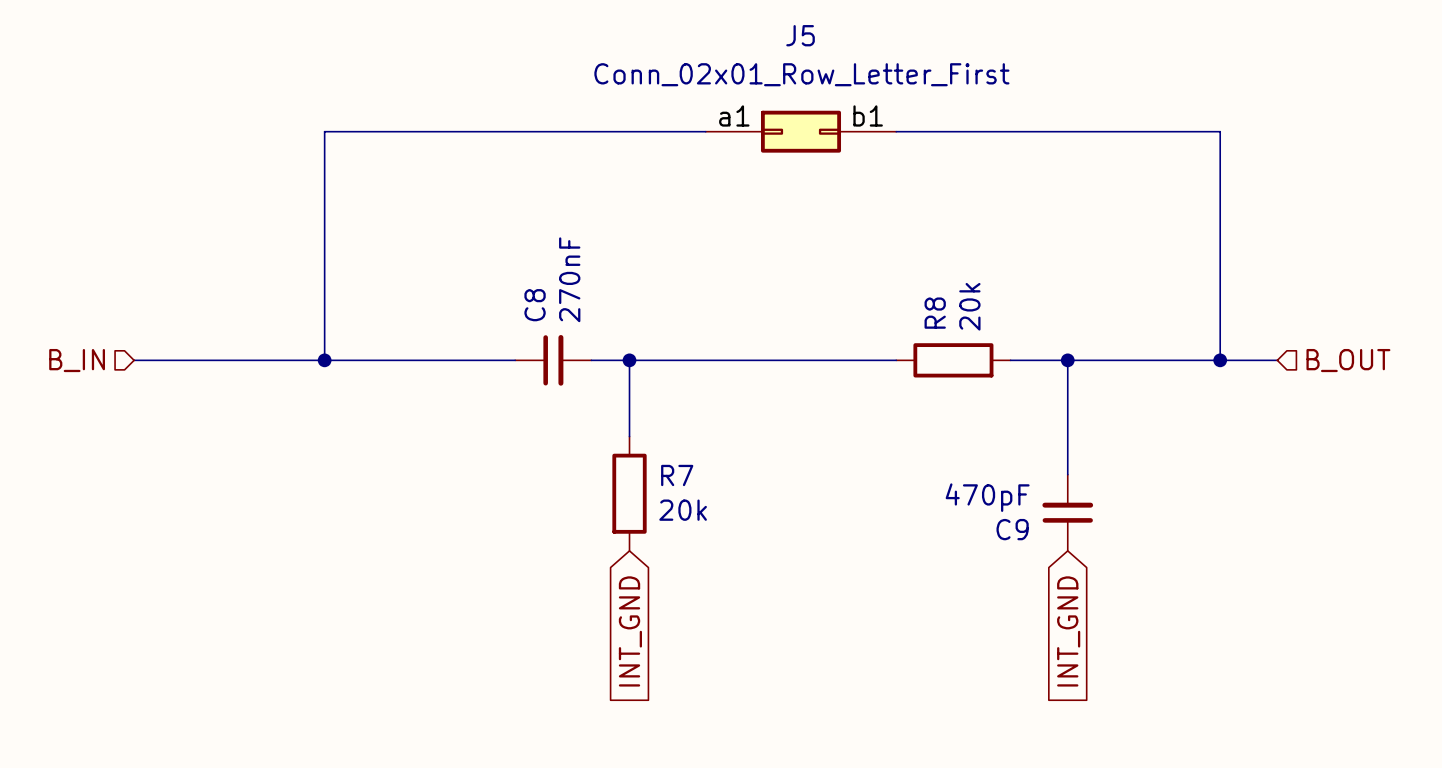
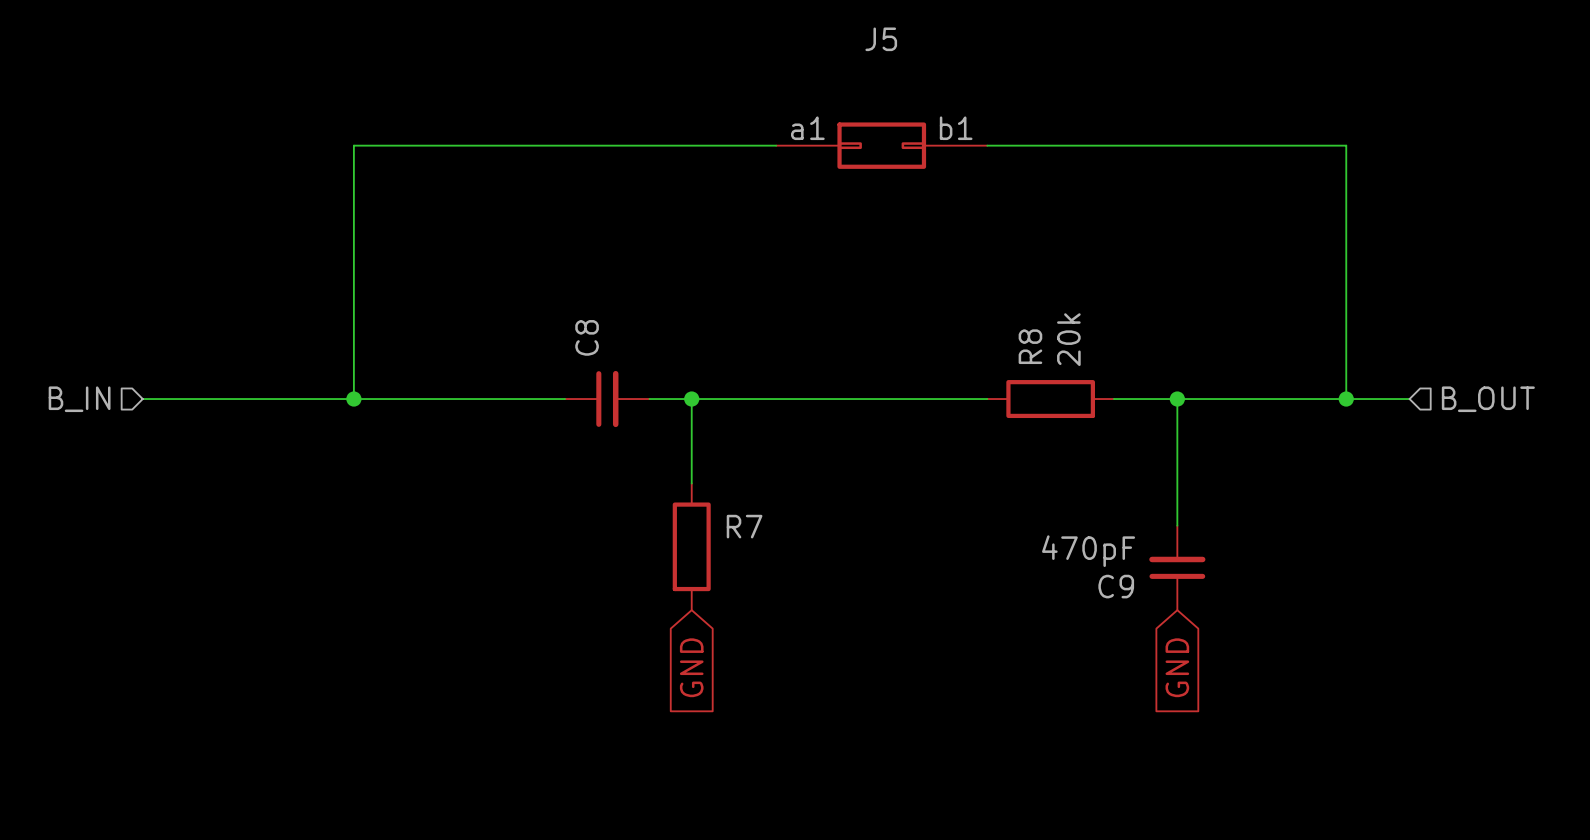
J5 value: Conn_02x01_Row_Letter_First (801, 74) -> none
C8 value: 270nF (569, 279) -> none
R7 value: 20k (683, 510) -> none
global label: INT_GND (630, 631) -> GND (691, 667)
global label: INT_GND (1068, 631) -> GND (1177, 667)

